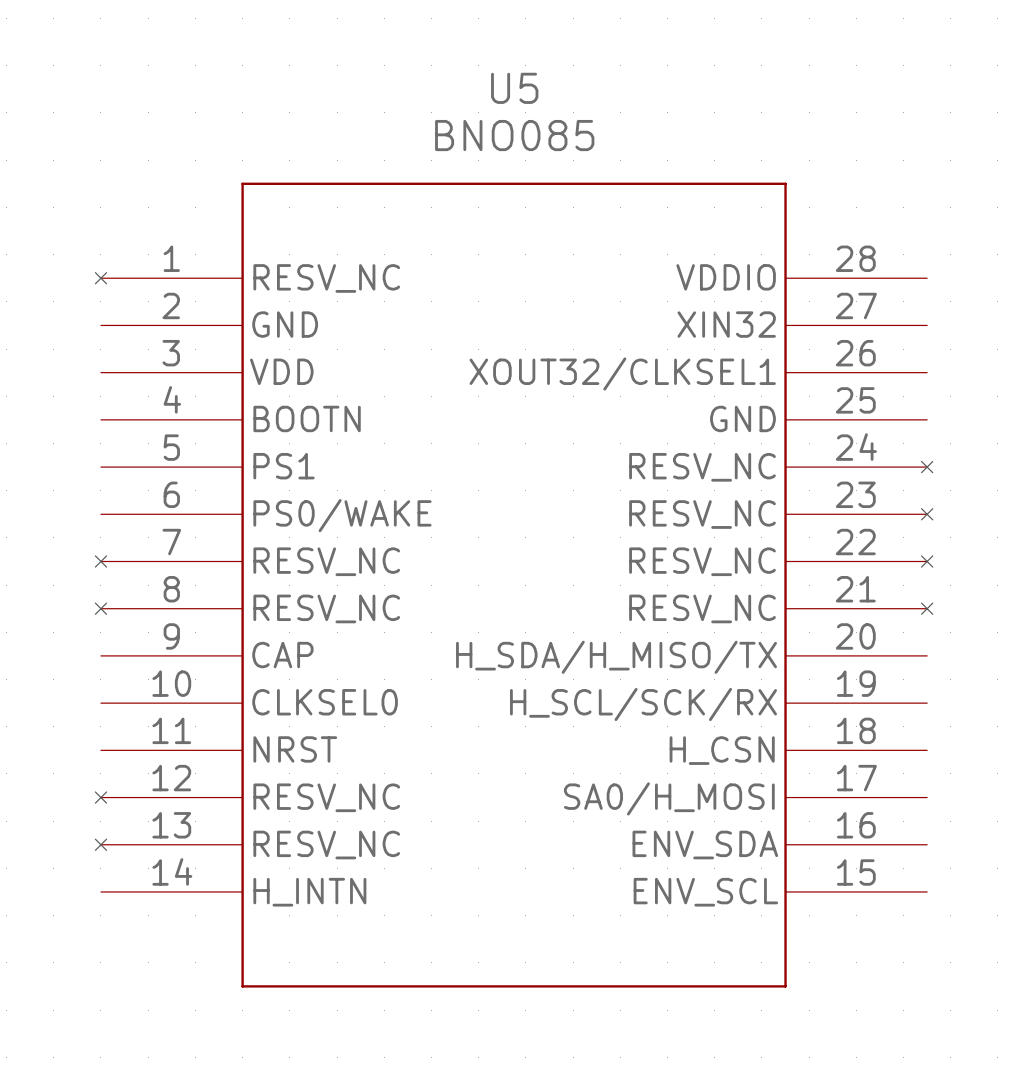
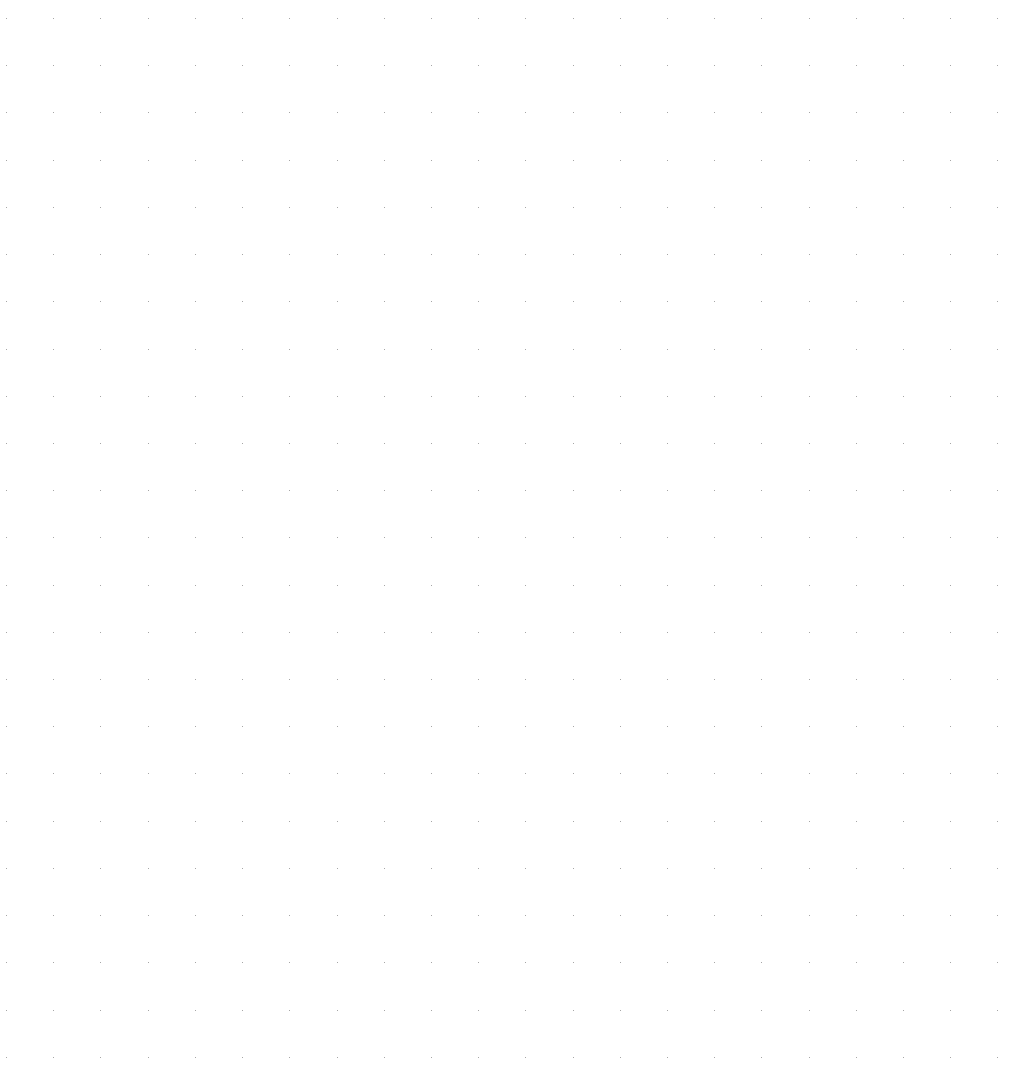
U5: BNO085 (514, 585) -> none

